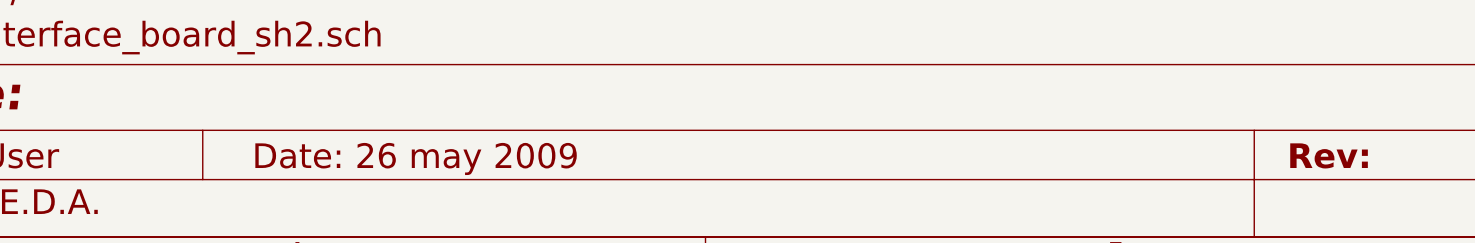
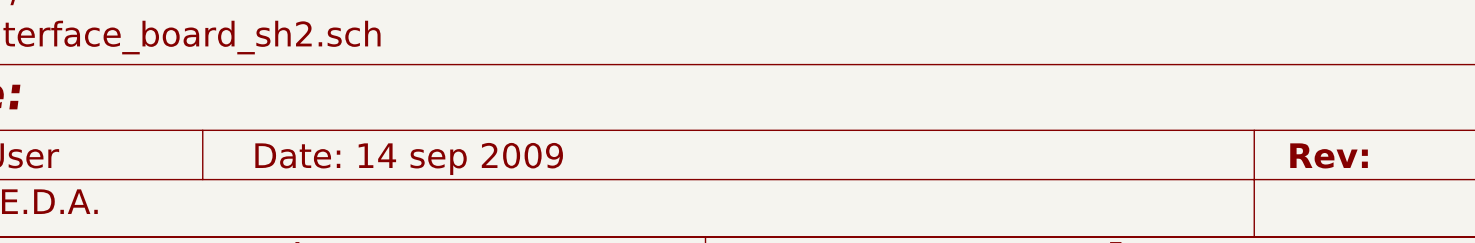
title block: Date: 26 may 2009 (416, 158) -> Date: 14 sep 2009 (409, 158)

